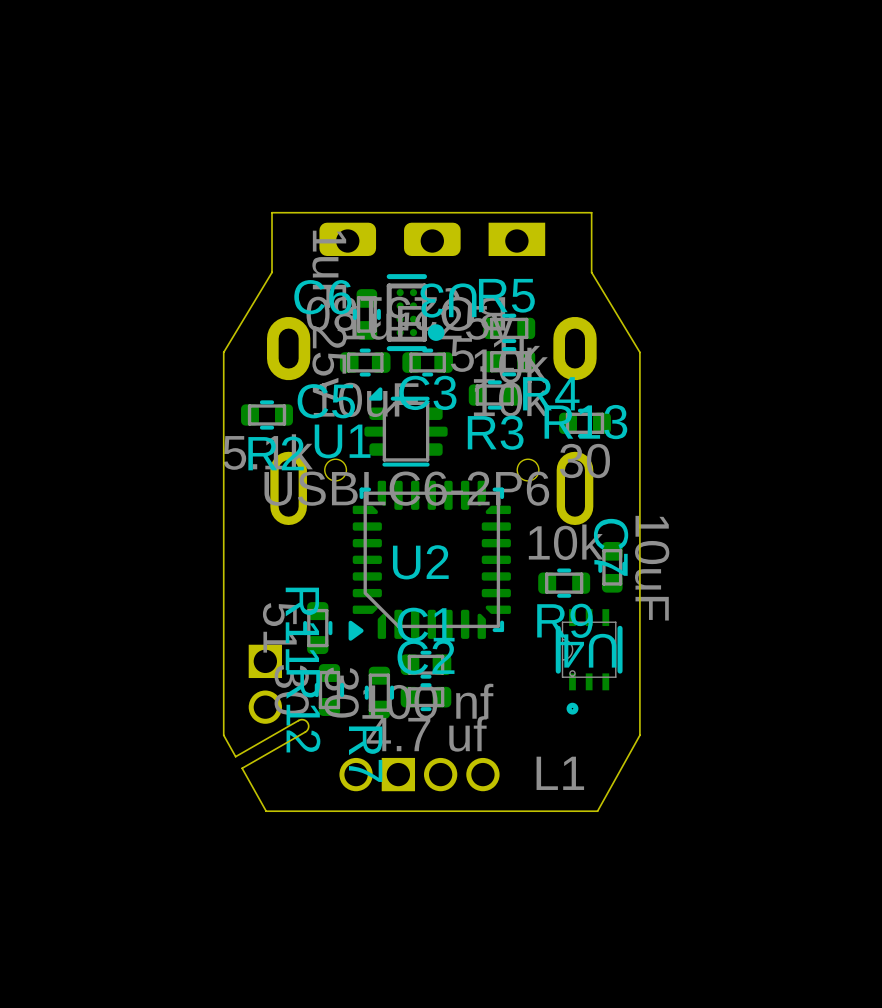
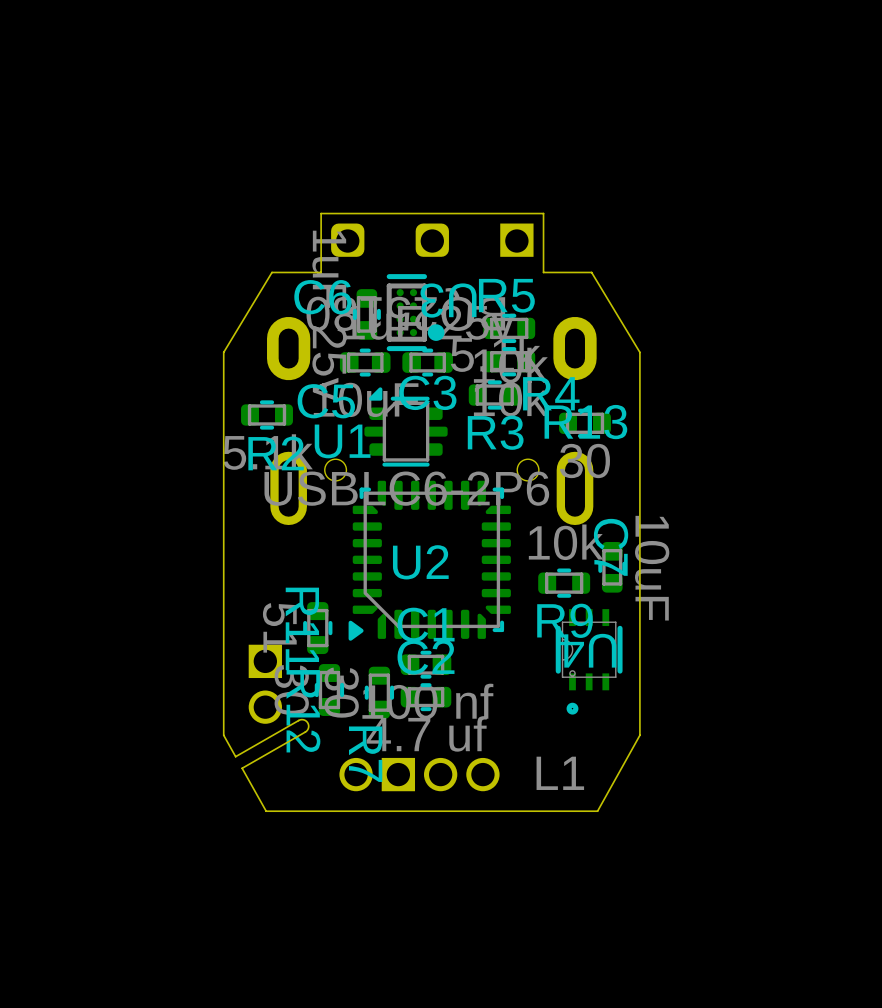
part footprint: [319, 222, 546, 256] -> [331, 223, 534, 257]
board edge: (591, 272) (591, 212) (272, 212) (272, 272) -> (591, 272) (543, 272) (543, 213) (321, 213) (321, 272) (272, 272)

